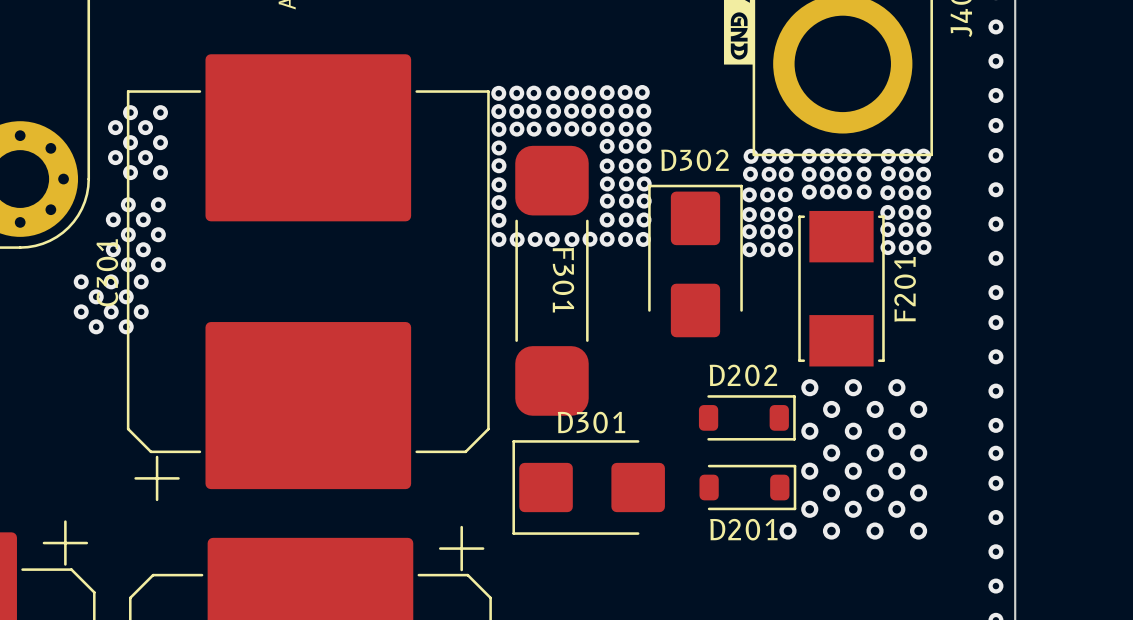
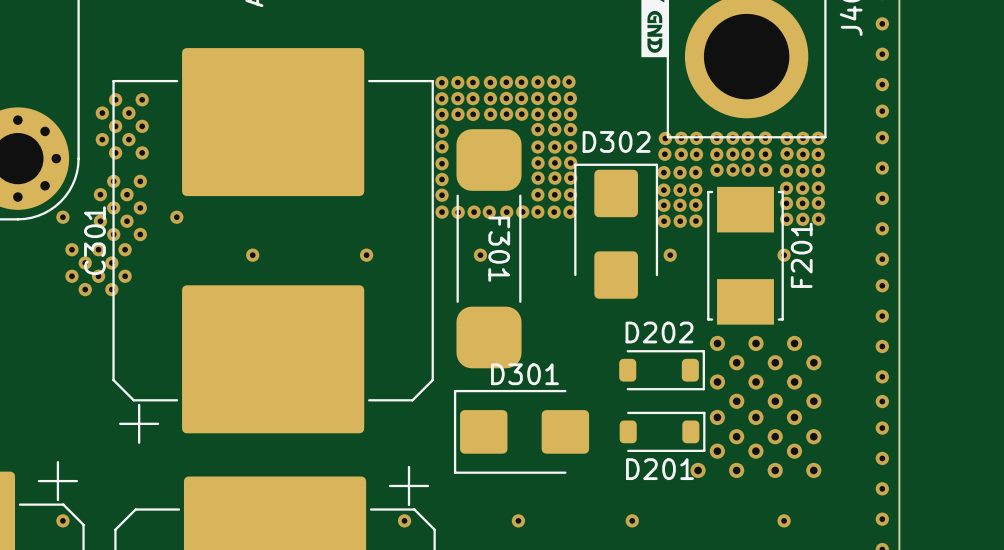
via: none -> (62, 217)
via: none -> (176, 217)
via: none -> (252, 255)
via: none -> (366, 255)
via: none -> (480, 255)
via: none -> (670, 255)
via: none -> (784, 255)
via: none -> (62, 520)
via: none -> (404, 520)
via: none -> (518, 520)
via: none -> (632, 520)
via: none -> (784, 520)

